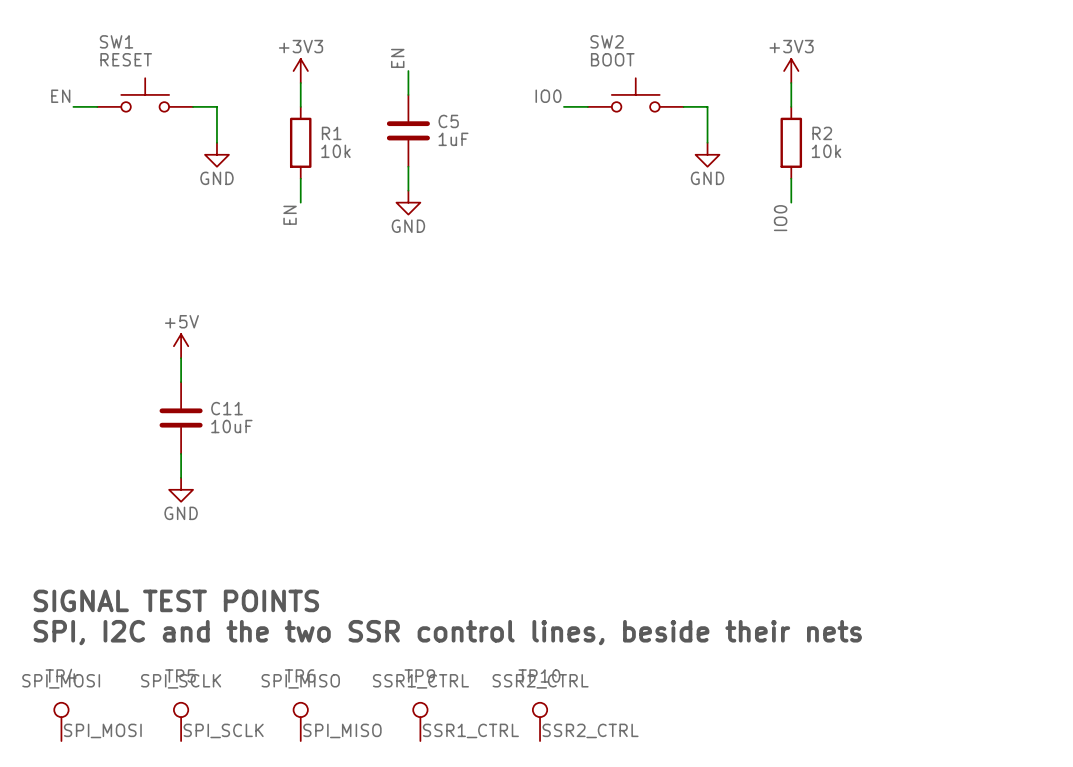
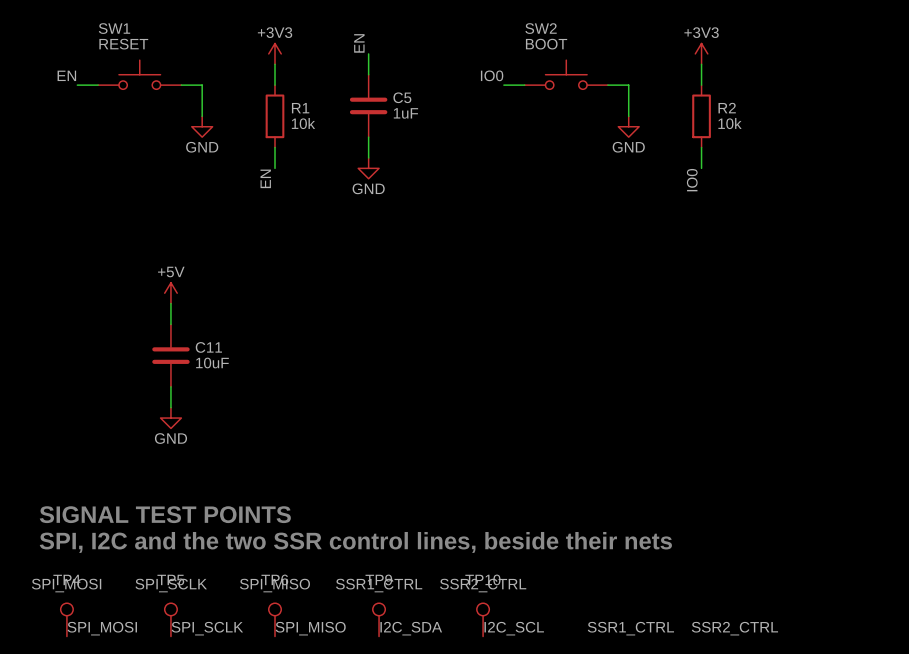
label: SSR1_CTRL (470, 730) -> I2C_SDA (411, 628)
label: SSR2_CTRL (590, 730) -> I2C_SCL (514, 628)
label: none -> SSR1_CTRL (630, 628)
label: none -> SSR2_CTRL (734, 628)

